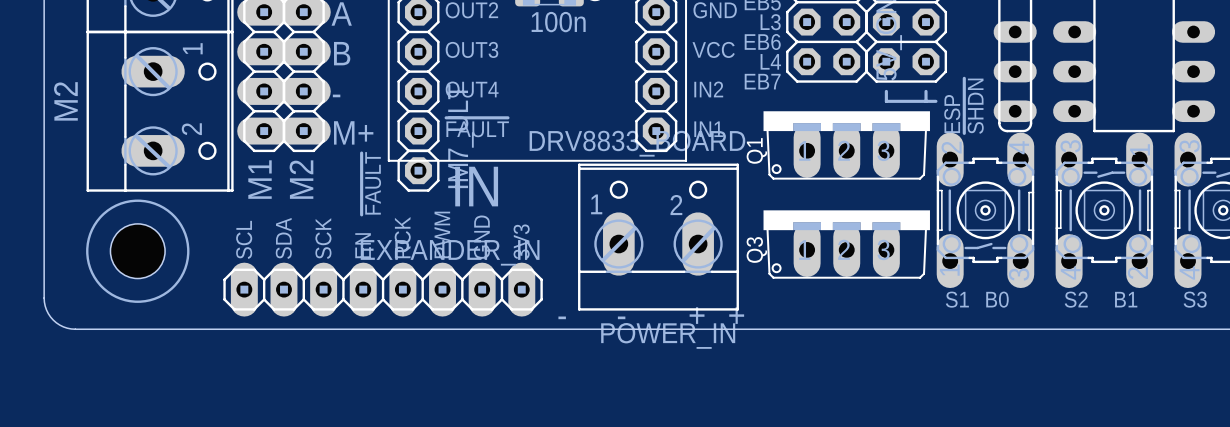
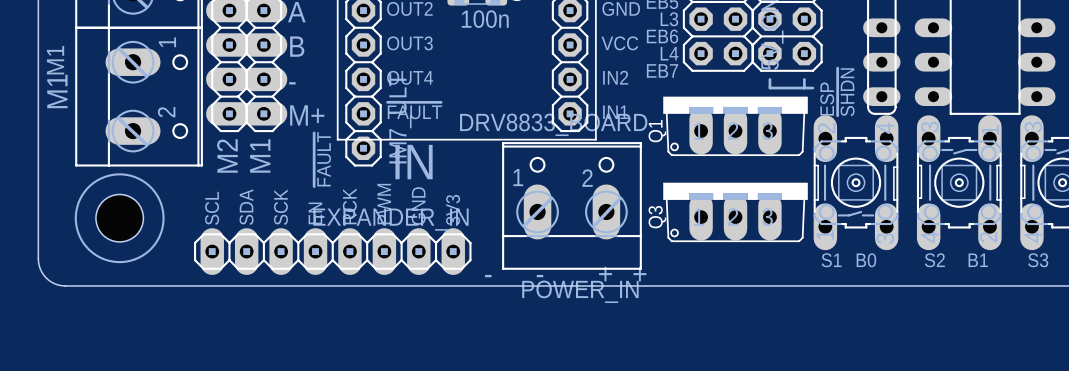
part value: none -> M1 (55, 60)
text: M2 (65, 101) -> M1 (57, 91)
text position: M1 (260, 179) -> M1 (260, 155)
text position: M2 (301, 179) -> M2 (227, 156)

